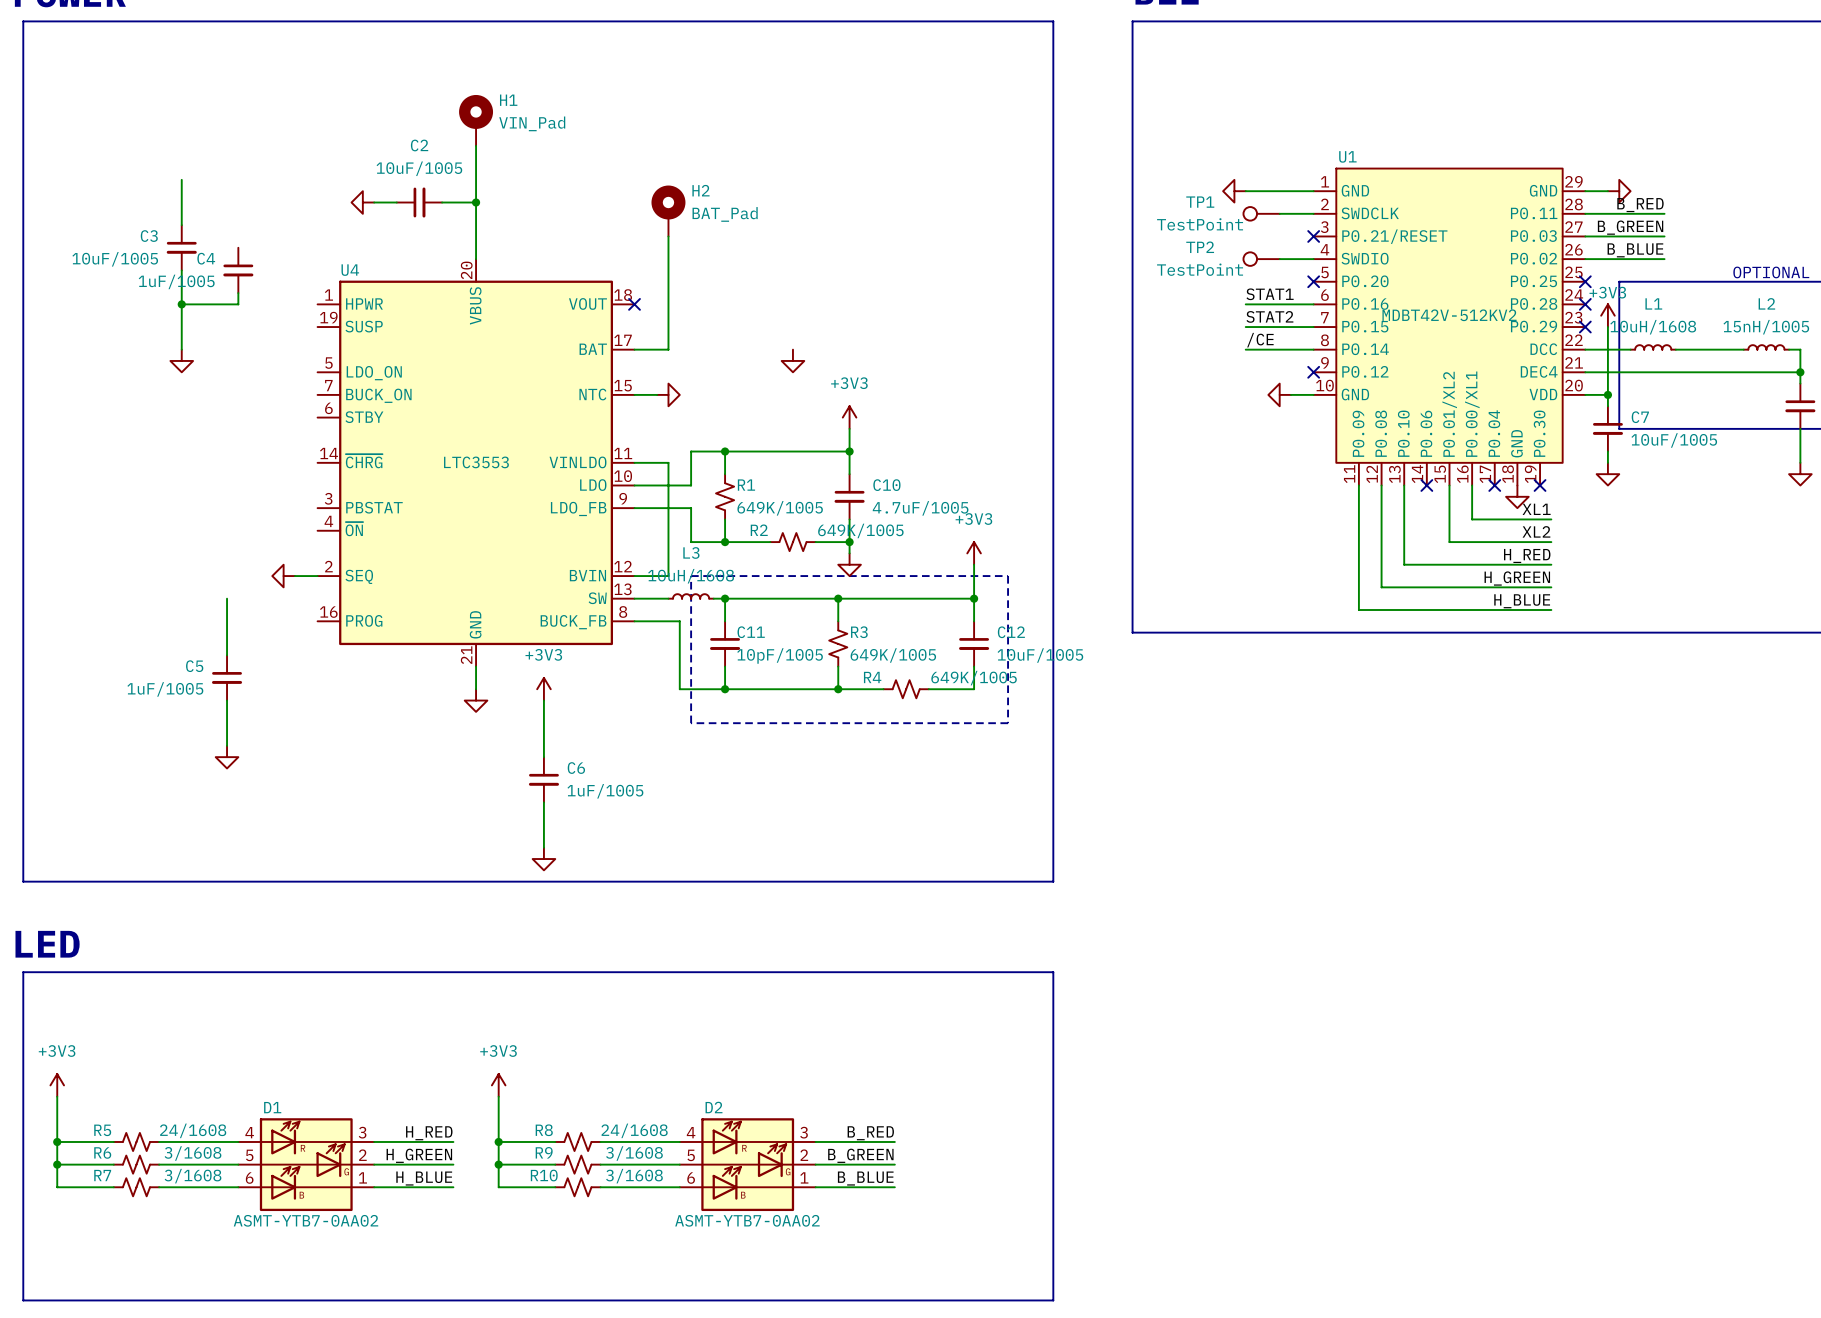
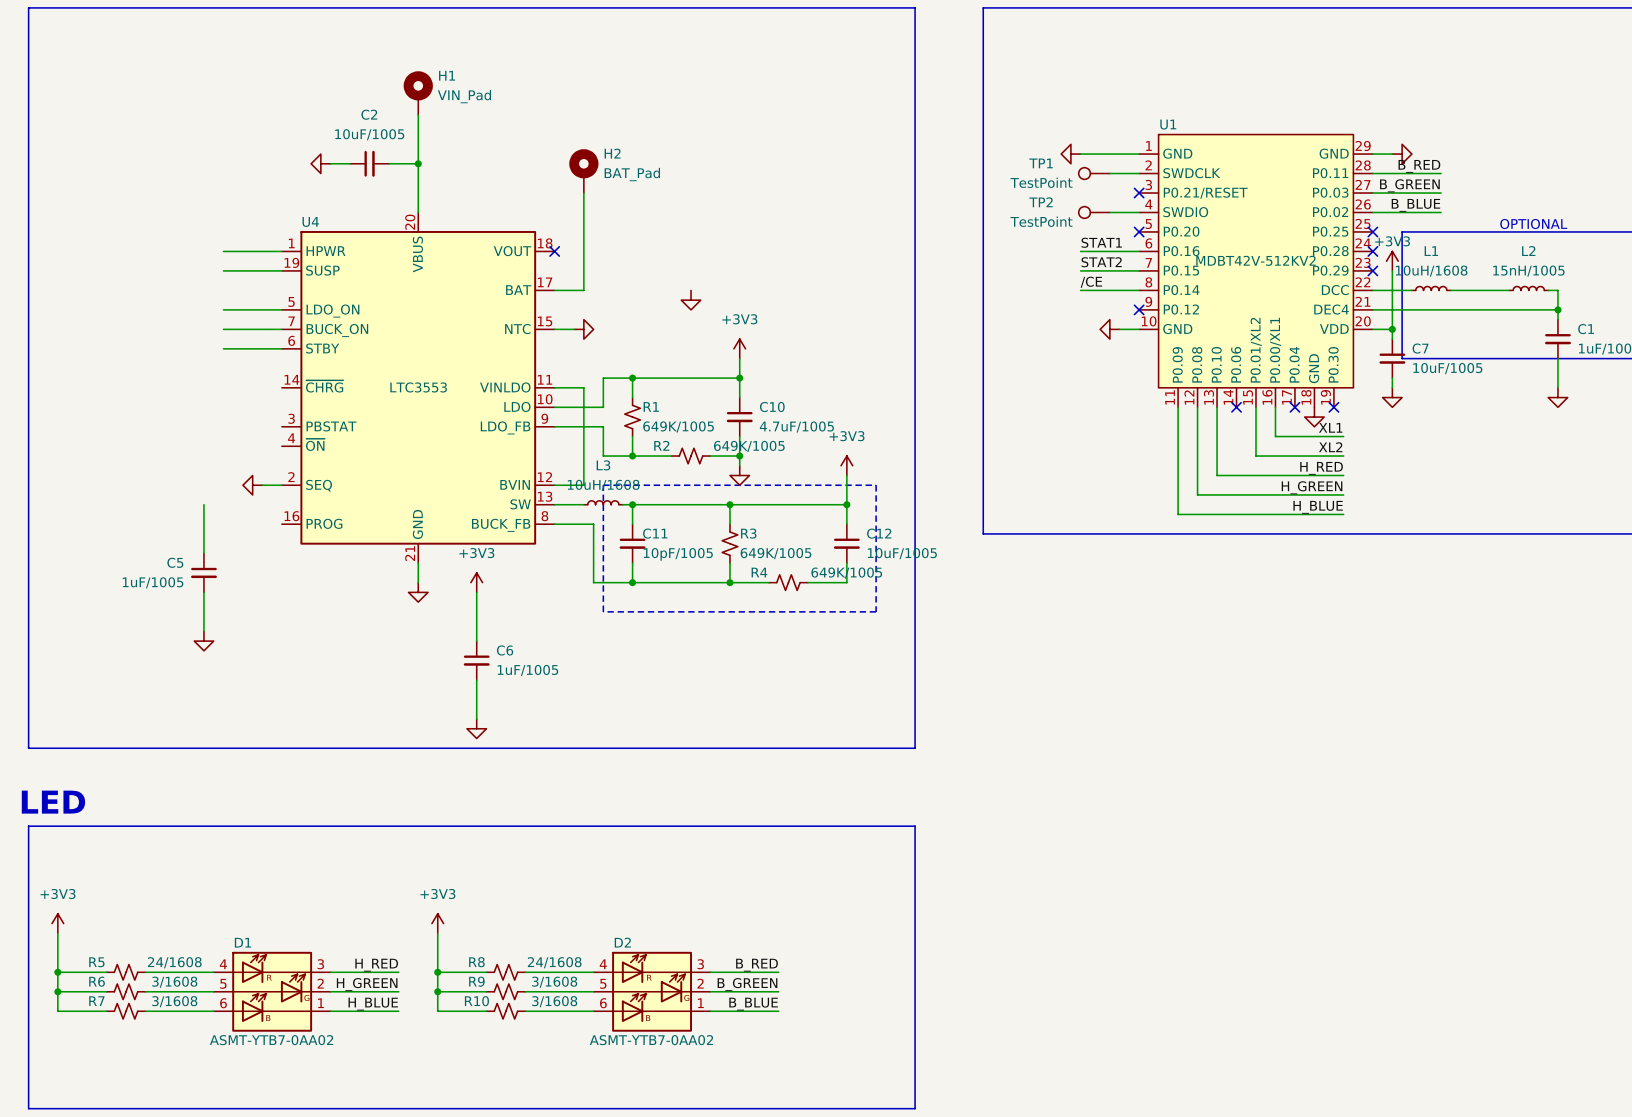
wire: (181, 179) (181, 225) -> none
C3: 10uF/1005 (181, 247) -> none
wire: (181, 270) (181, 349) -> none
C4: 1uF/1005 (238, 270) -> none
wire: (238, 293) (238, 304) (181, 304) -> none
junction: (181, 304) -> none
wire: none -> (223, 251) (281, 251)
wire: none -> (223, 270) (281, 270)
power symbol: (181, 360) -> none
wire: none -> (223, 309) (281, 309)
wire: none -> (223, 329) (281, 329)
wire: none -> (223, 348) (281, 348)

